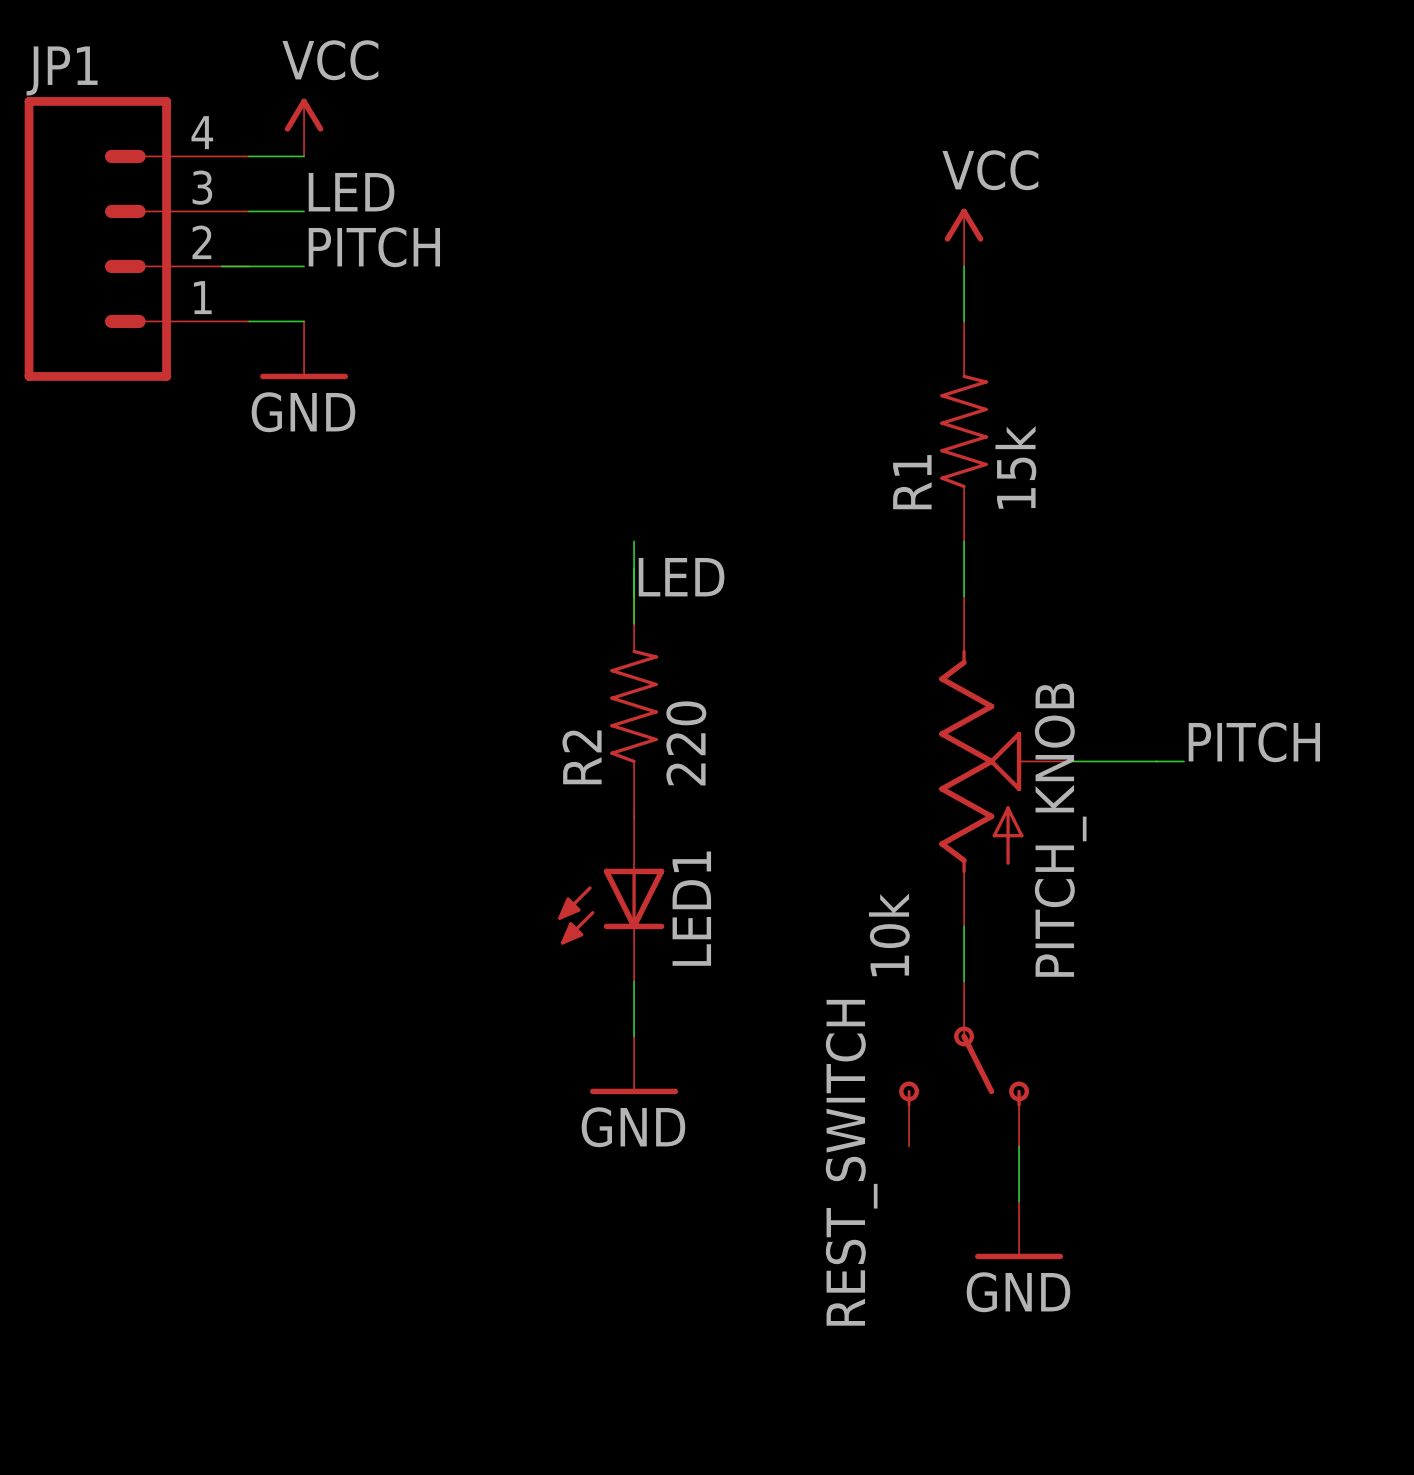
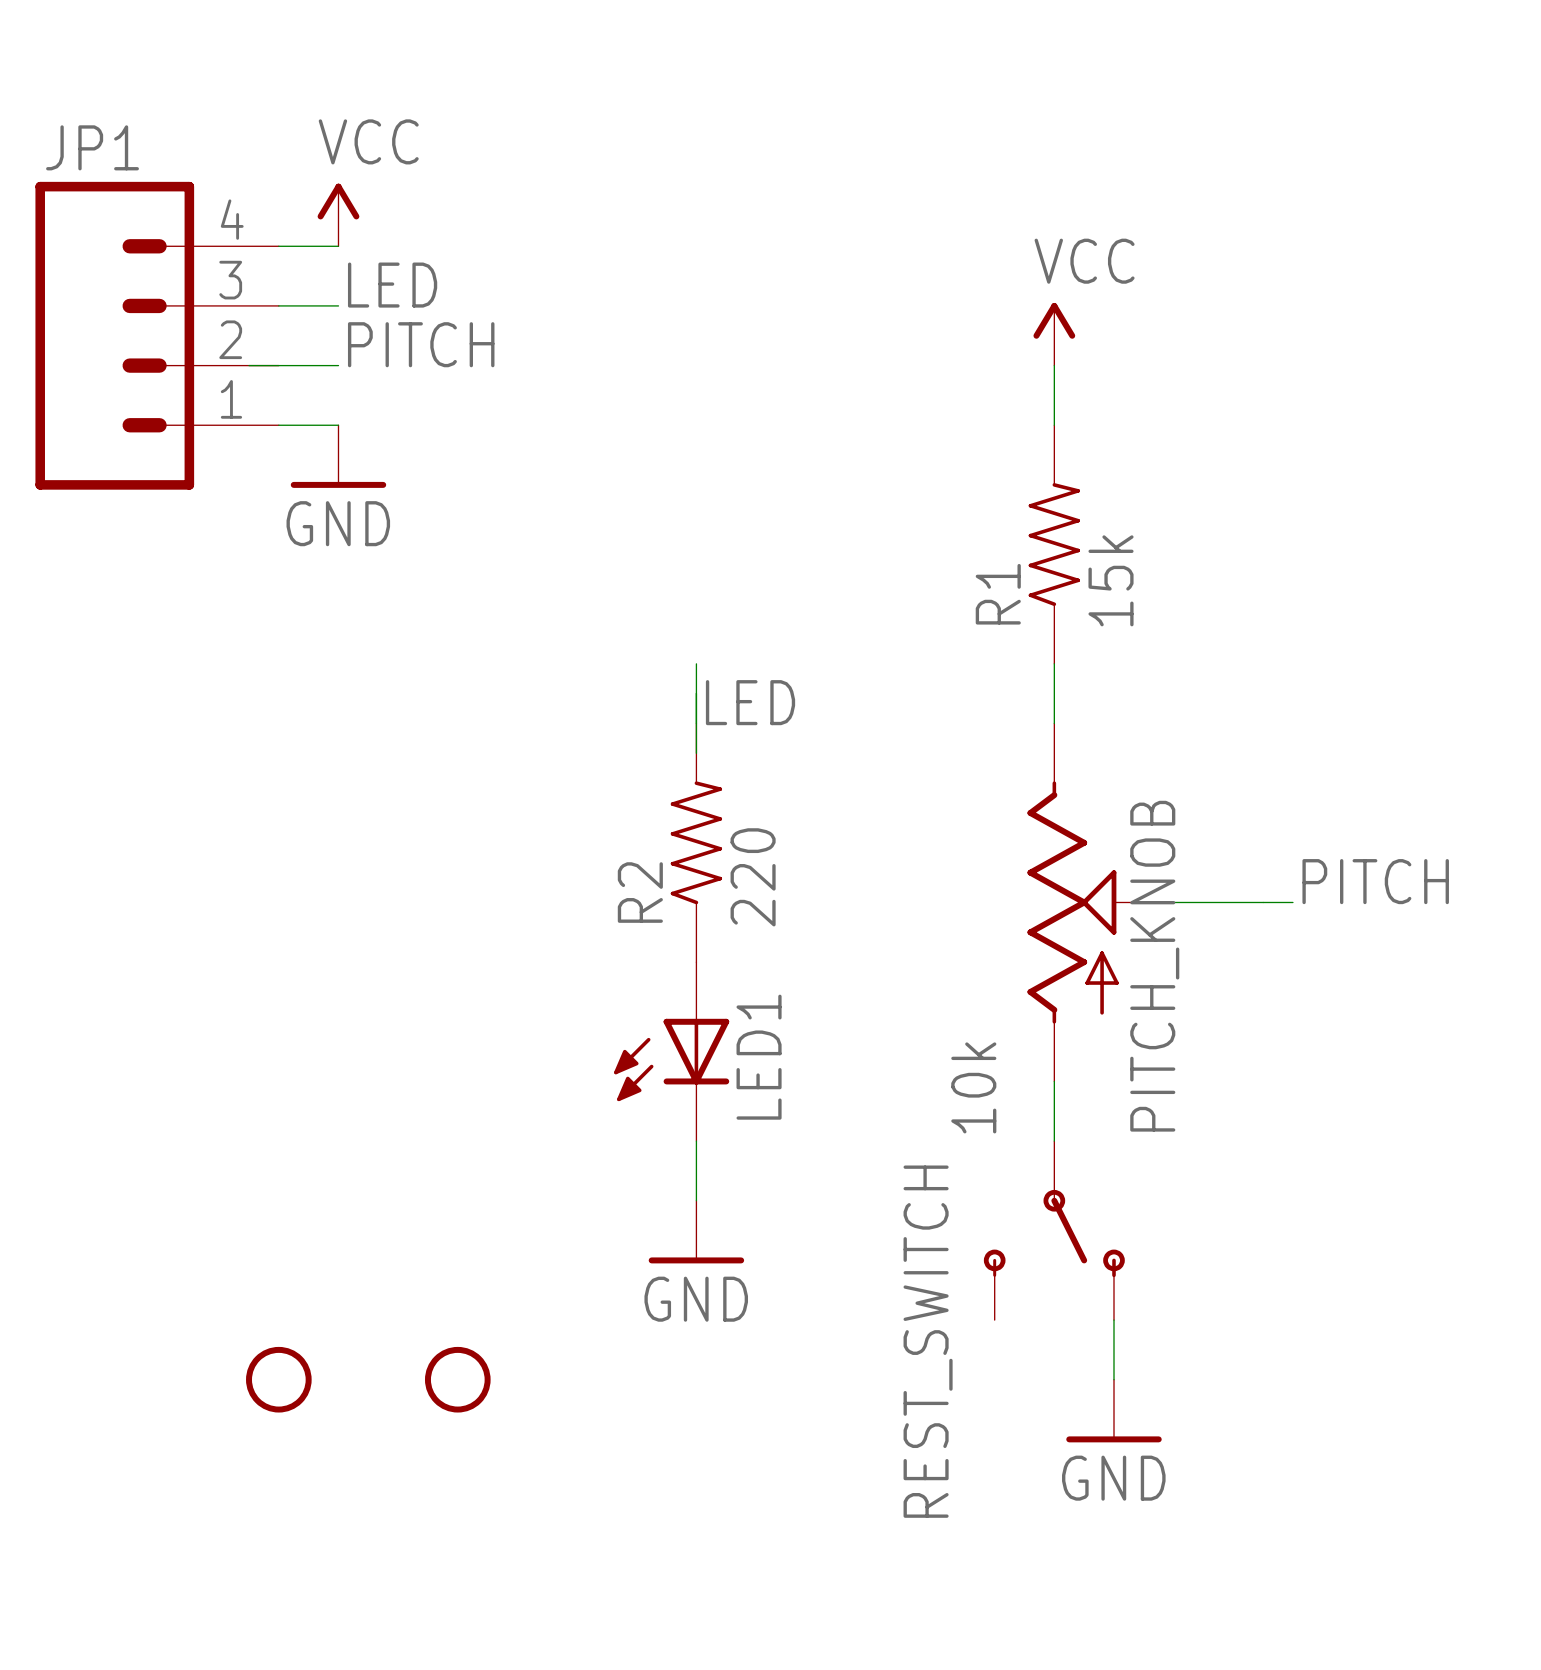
part: none -> (278, 1379)
part: none -> (457, 1379)

